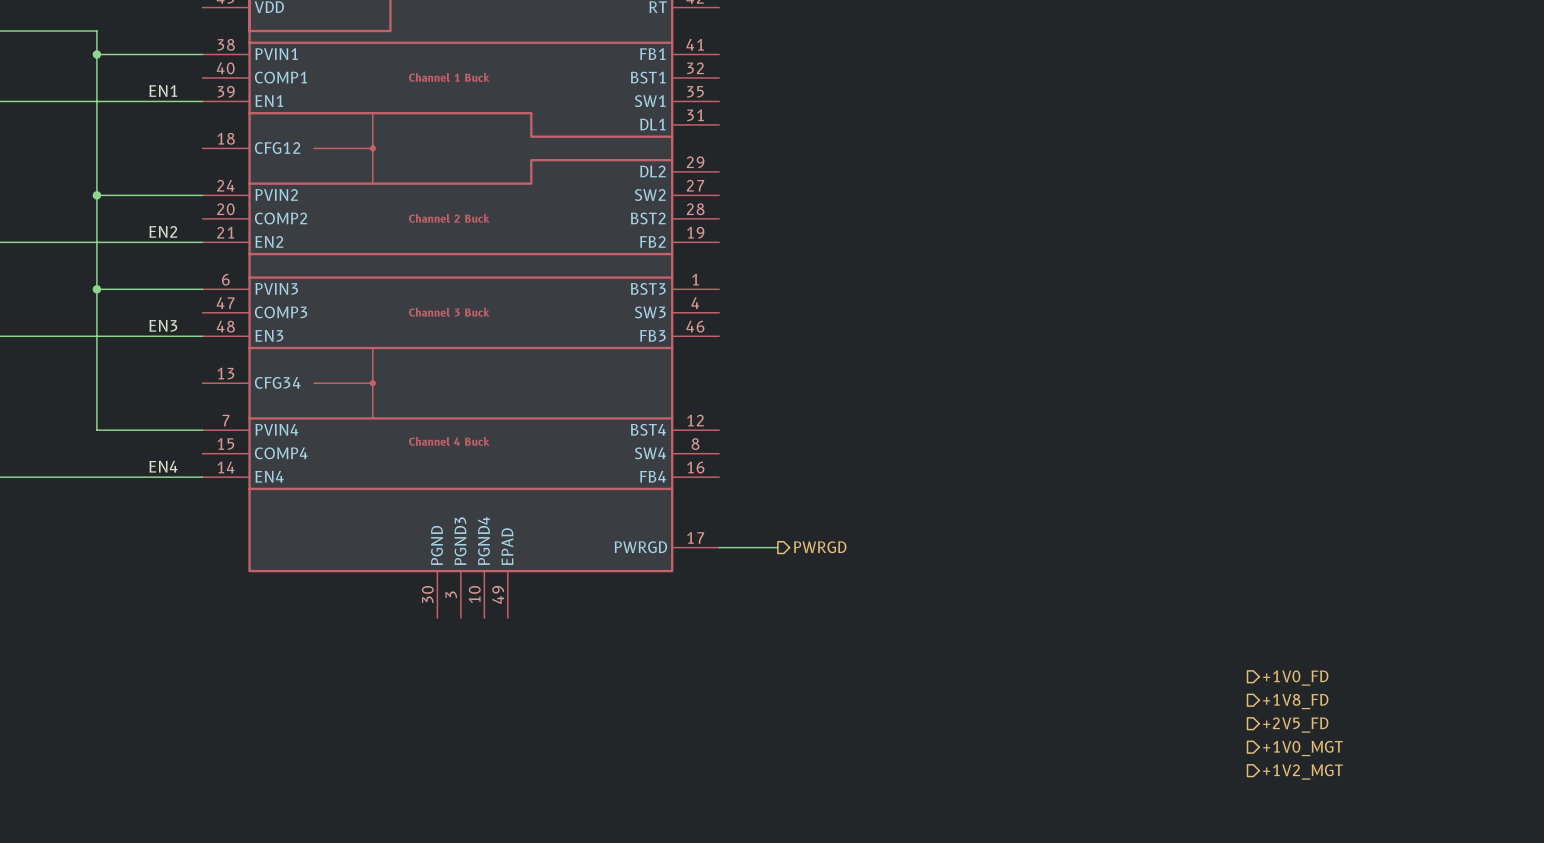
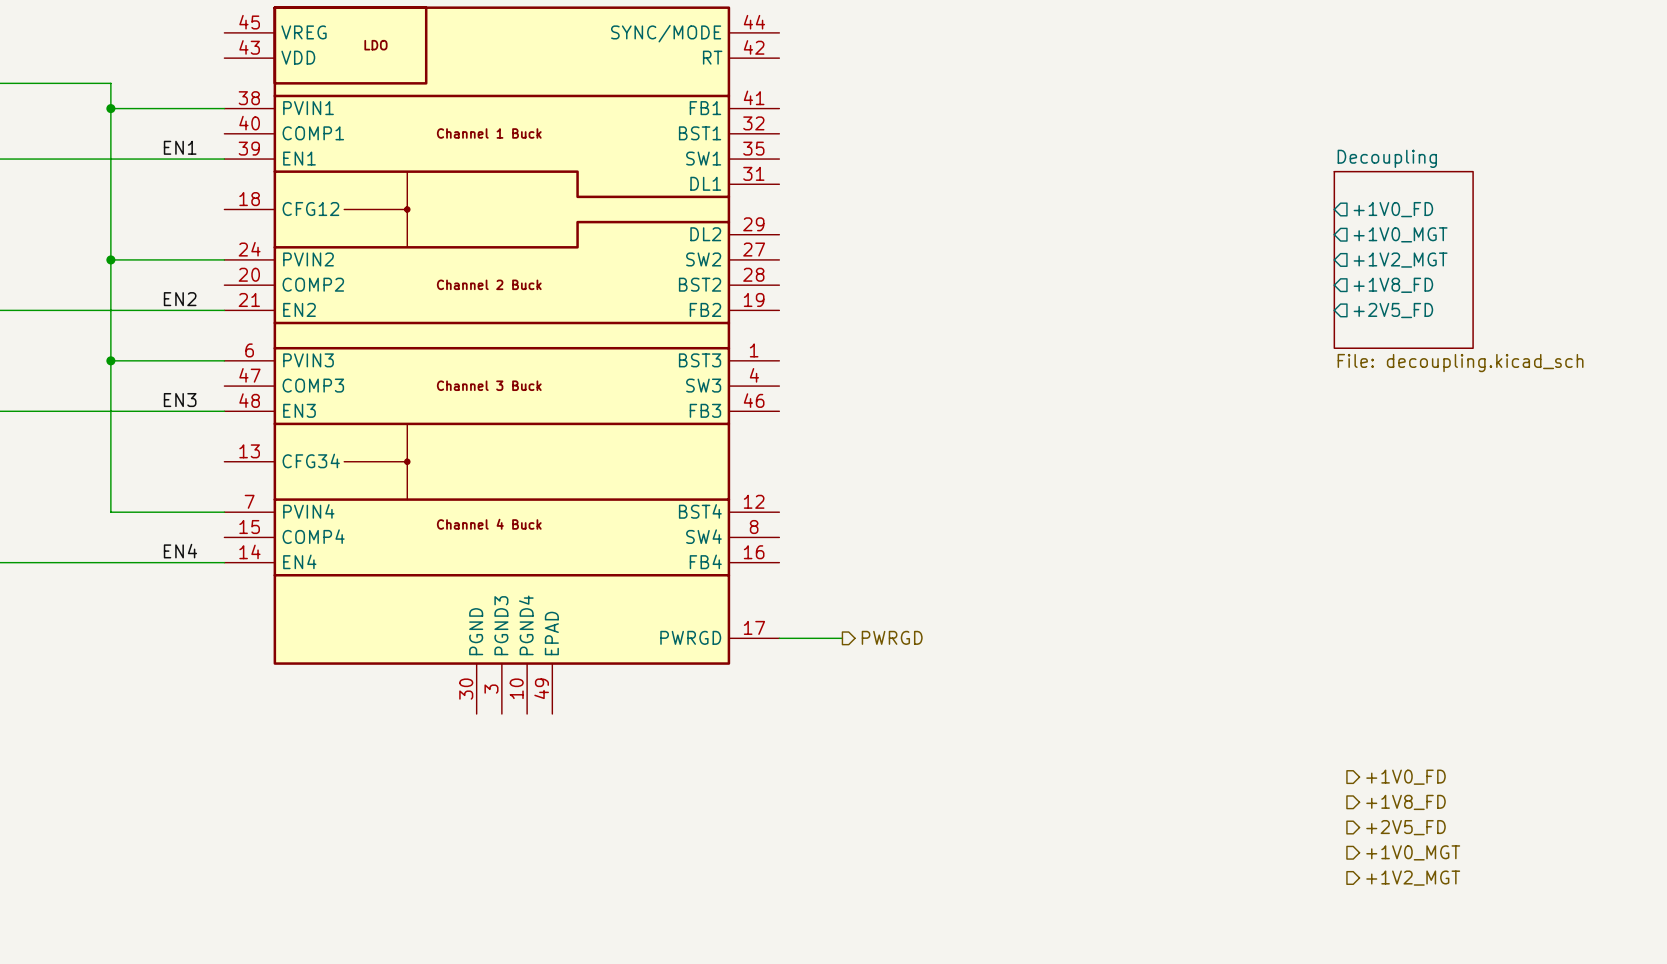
sheet pin: none -> +1V0_FD (1393, 209)
sheet pin: none -> +1V0_MGT (1400, 234)
sheet Decoupling: none -> File: decoupling.kicad_sch (1403, 259)
sheet pin: none -> +1V2_MGT (1400, 260)
sheet pin: none -> +1V8_FD (1393, 285)
sheet pin: none -> +2V5_FD (1393, 310)

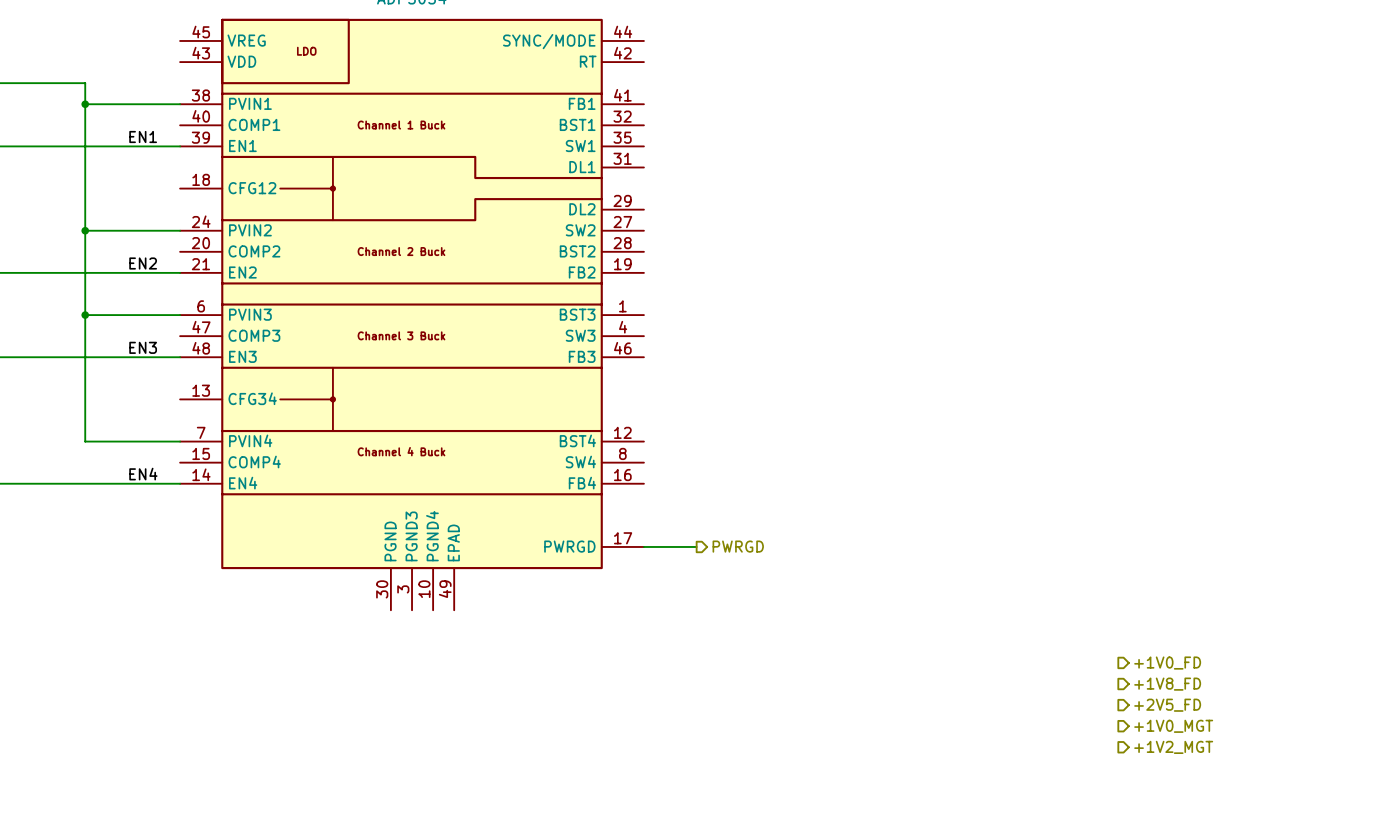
sheet pin: +1V0_FD (1393, 209) -> none
sheet pin: +1V0_MGT (1400, 234) -> none
sheet Decoupling: File: decoupling.kicad_sch (1403, 259) -> none
sheet pin: +1V2_MGT (1400, 260) -> none
sheet pin: +1V8_FD (1393, 285) -> none
sheet pin: +2V5_FD (1393, 310) -> none

